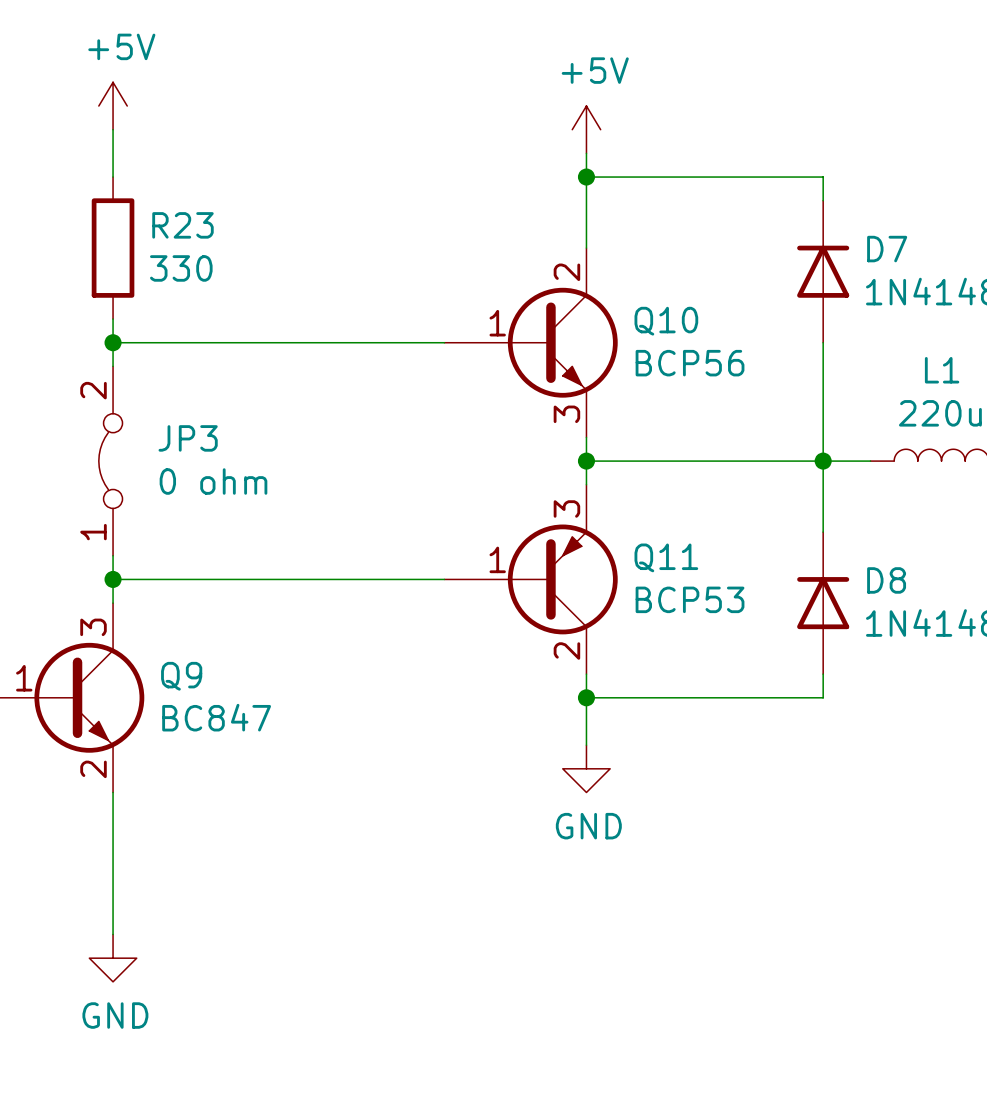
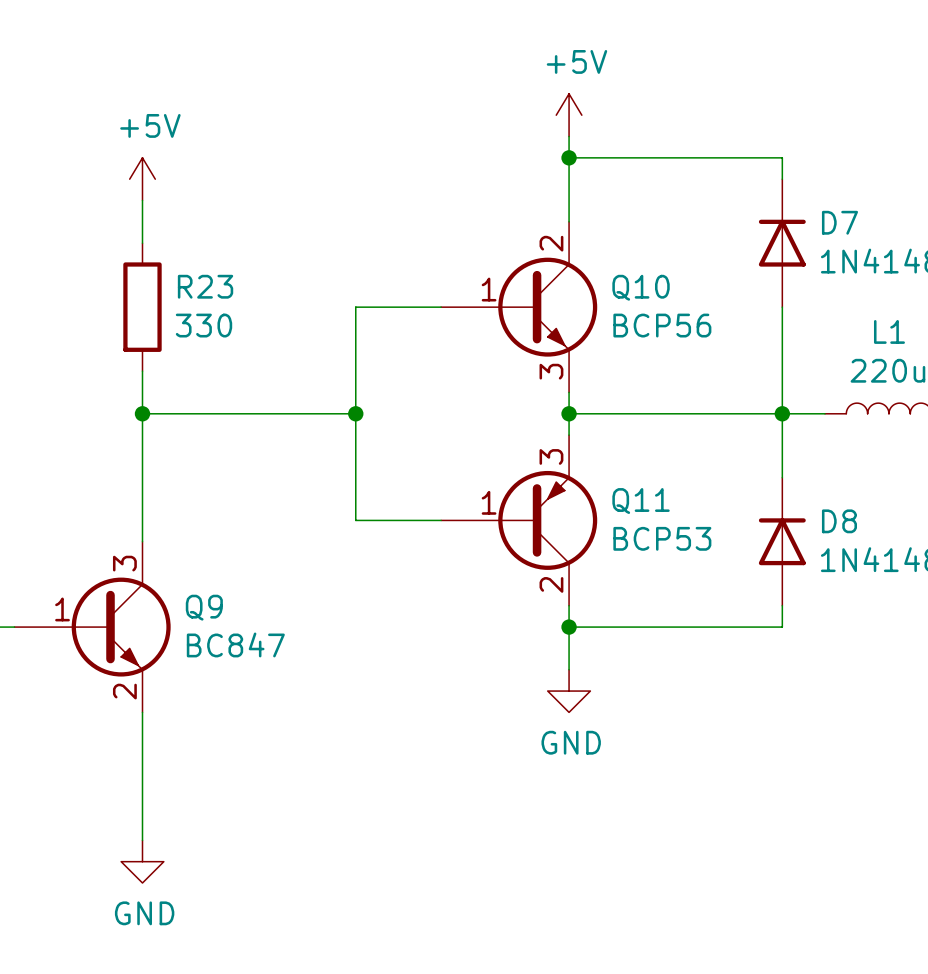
power symbol position: +5V (113, 106) -> +5V (142, 179)
wire: (113, 129) (113, 177) -> none
R23 position: (113, 248) -> (142, 307)
wire: (113, 319) (113, 366) -> (142, 200) (142, 243)
wire: (113, 342) (349, 342) -> (355, 520) (355, 307)
junction: (113, 342) -> none
wire: none -> (142, 371) (142, 499)
JP3: 0 ohm (110, 461) -> none
junction: none -> (142, 413)
junction: none -> (355, 413)
wire: (113, 579) (349, 579) -> (142, 413) (355, 413)
junction: (113, 579) -> none

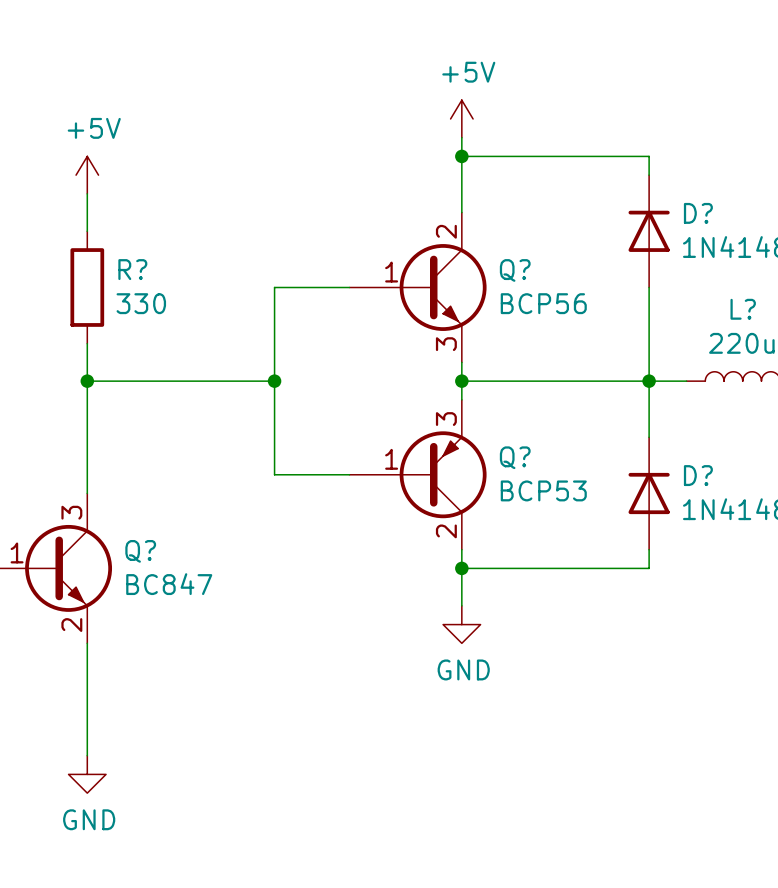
D7 name: D7 (839, 222) -> D? (698, 213)
R23 name: R23 (205, 286) -> R? (132, 269)
Q10 name: Q10 (641, 287) -> Q? (515, 270)
L1 name: L1 (889, 331) -> L? (743, 309)
Q11 name: Q11 (641, 501) -> Q? (515, 457)
D8 name: D8 (839, 521) -> D? (698, 475)
Q9 name: Q9 (204, 607) -> Q? (140, 551)

